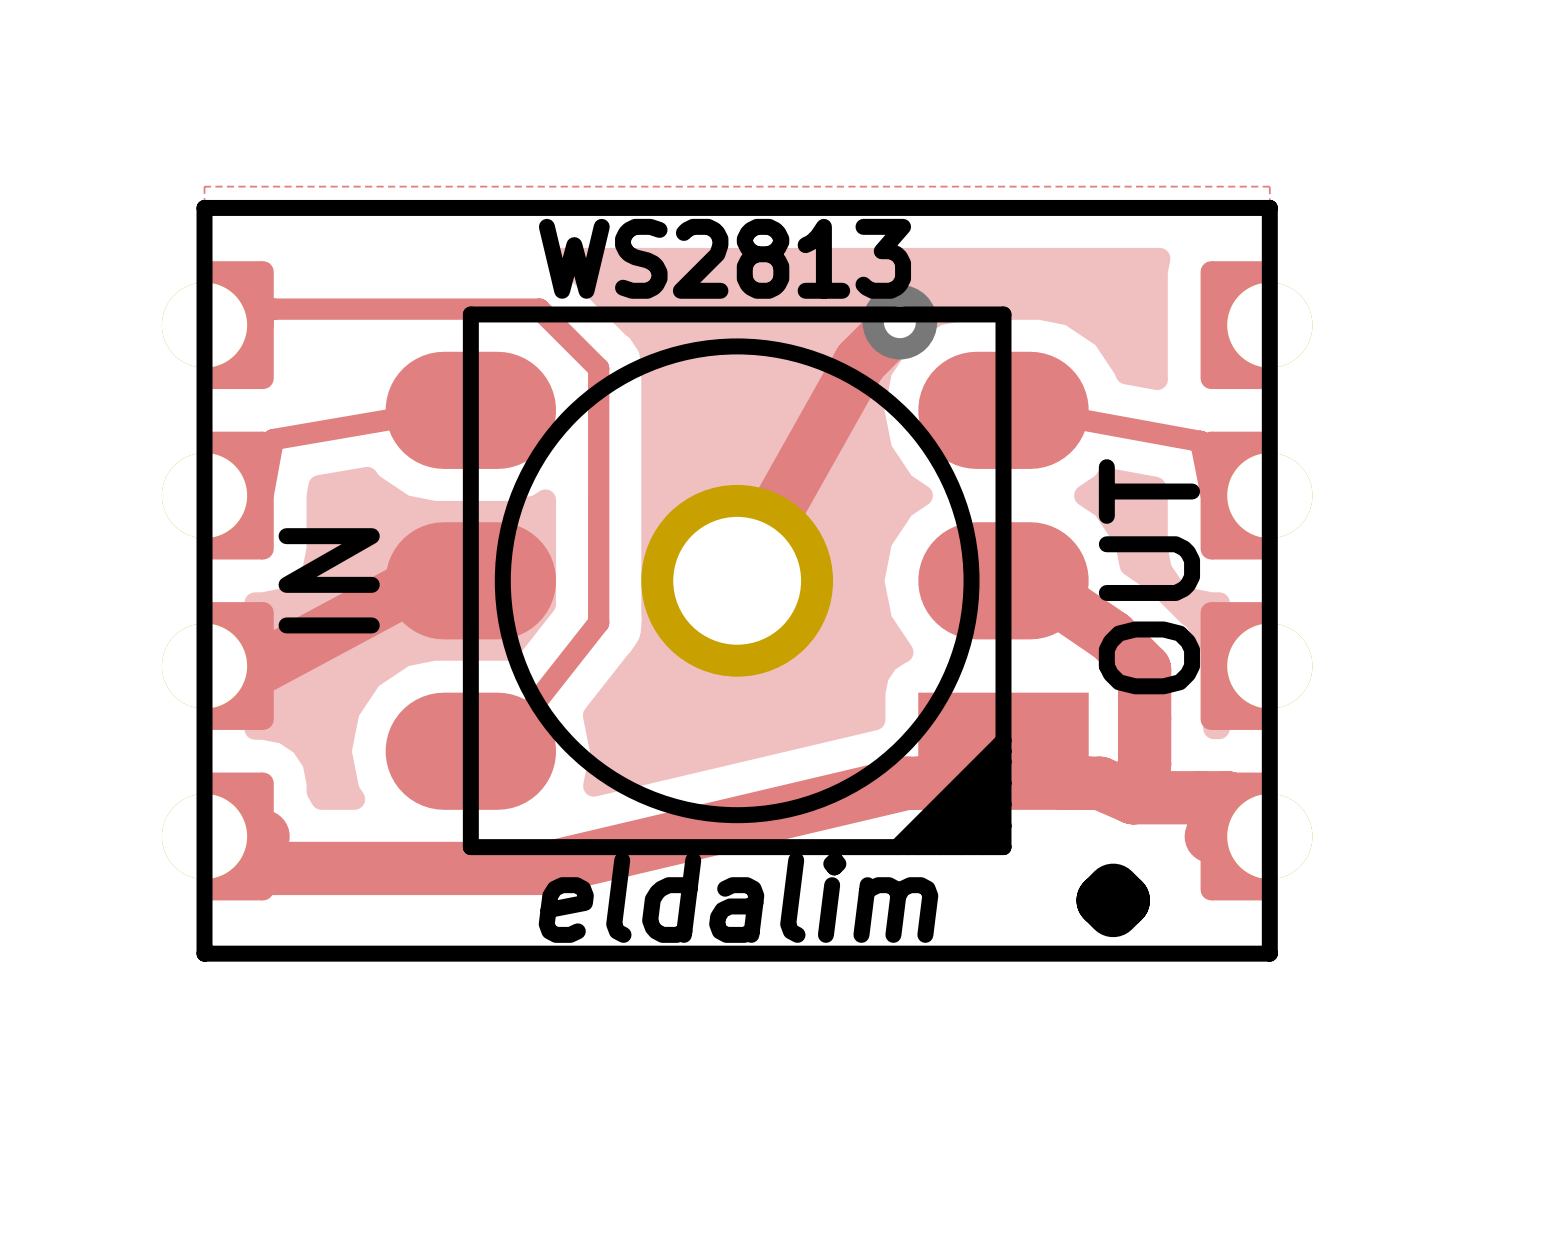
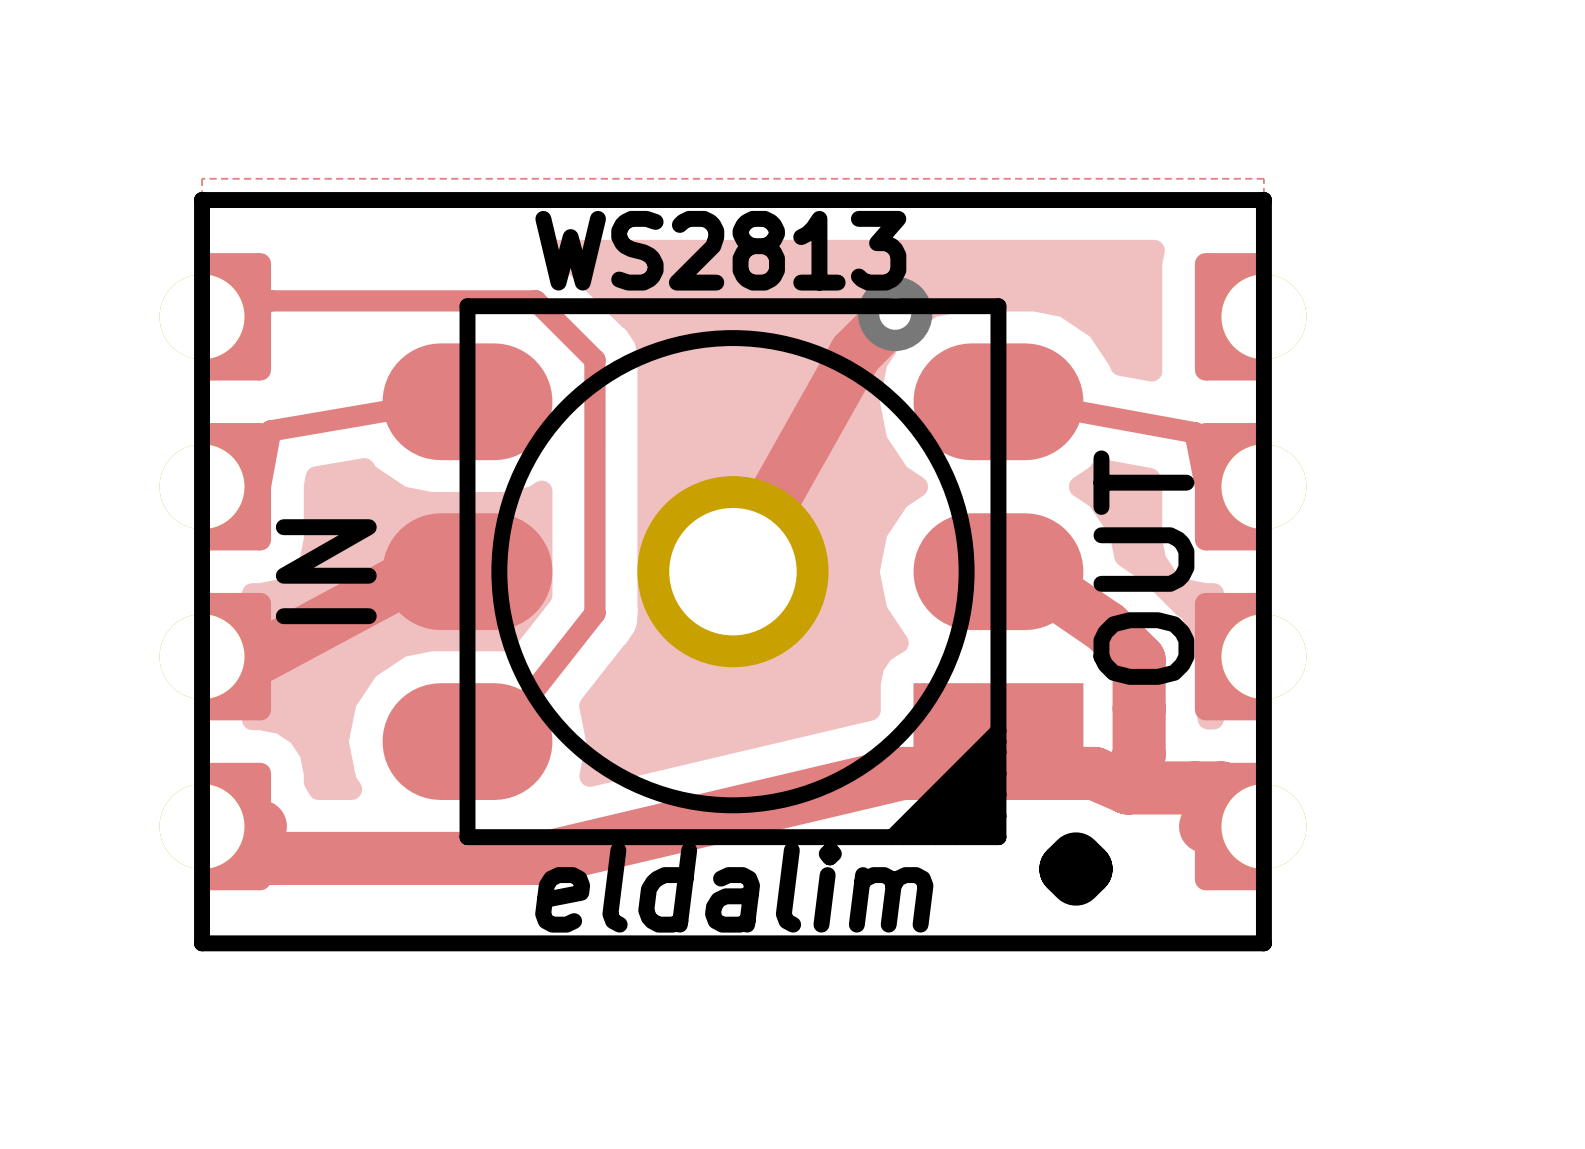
part text position: . (1113, 900) -> . (1075, 869)

